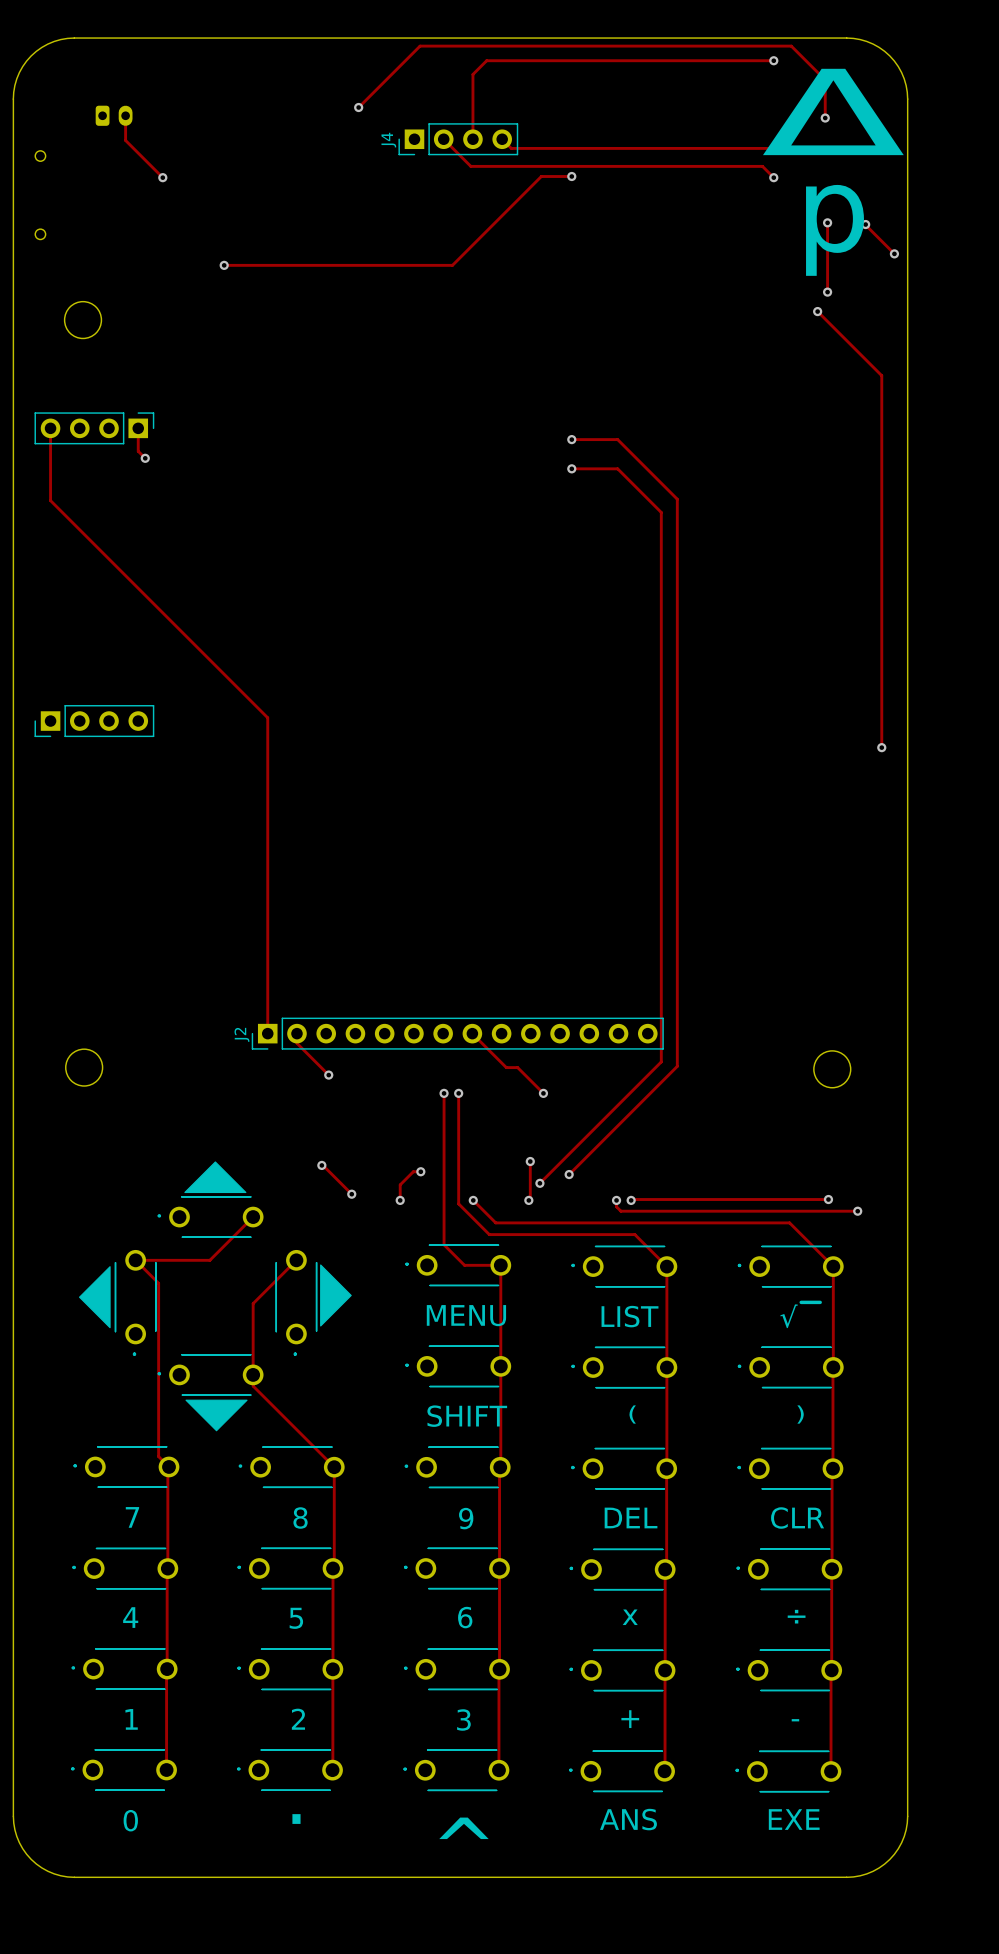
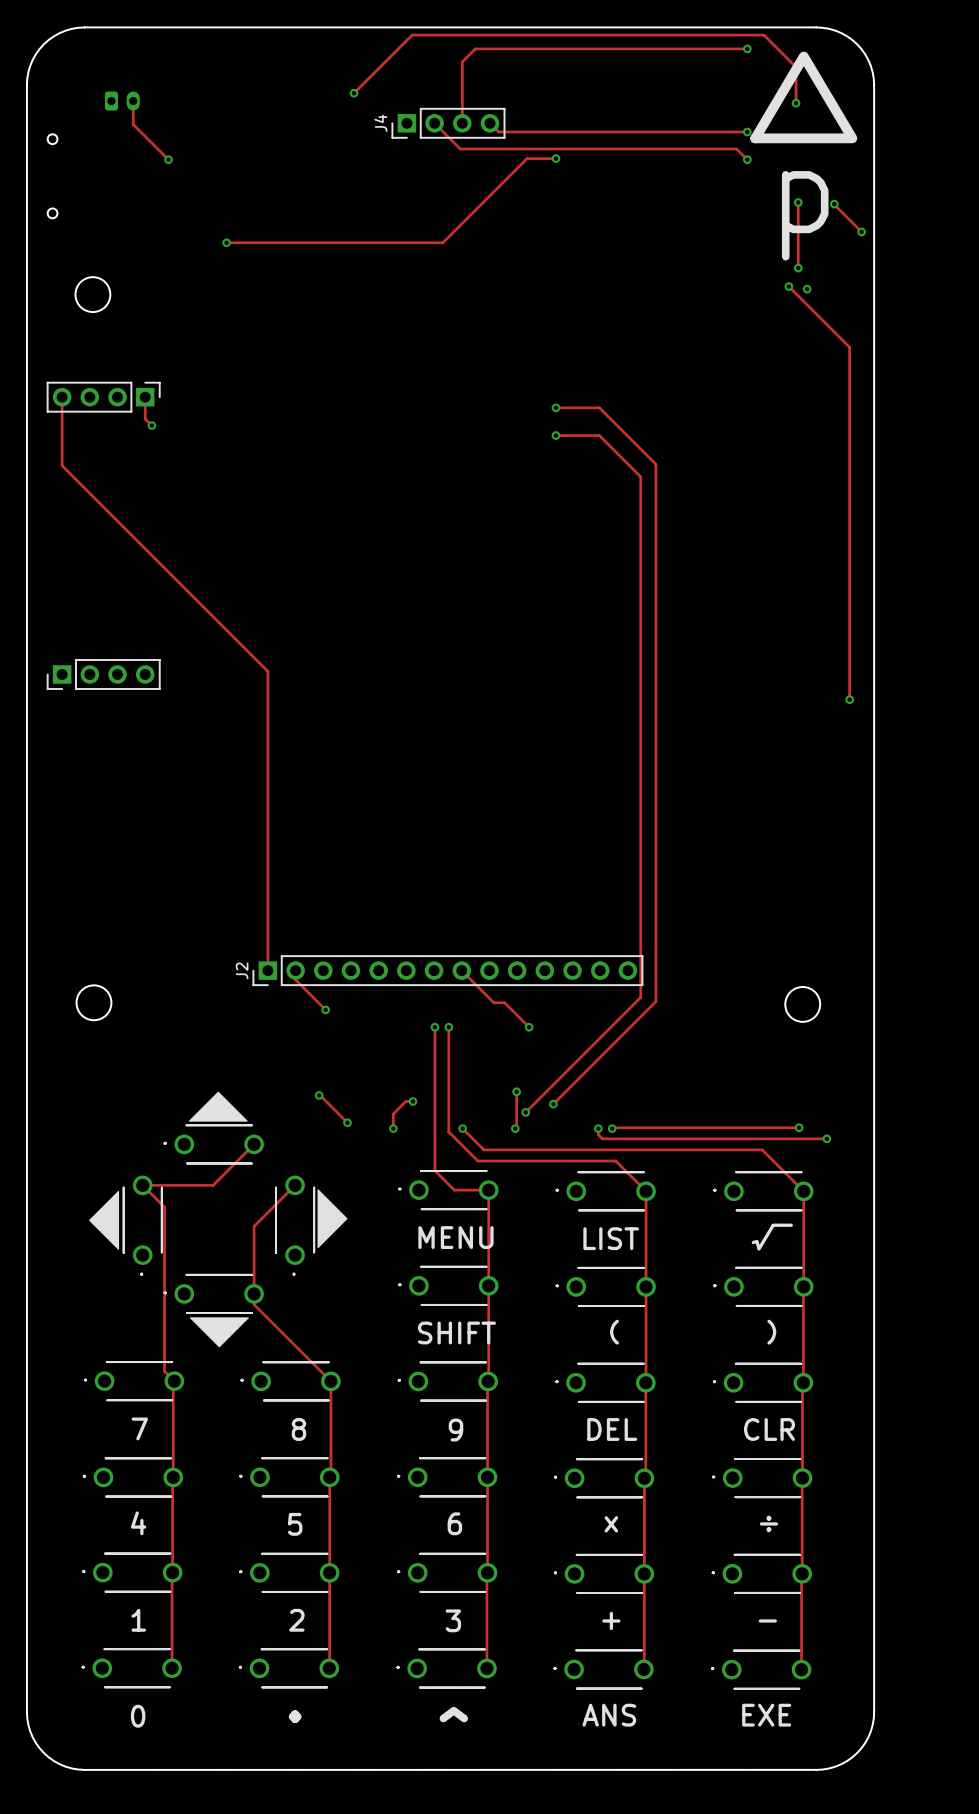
via: none -> (807, 289)

